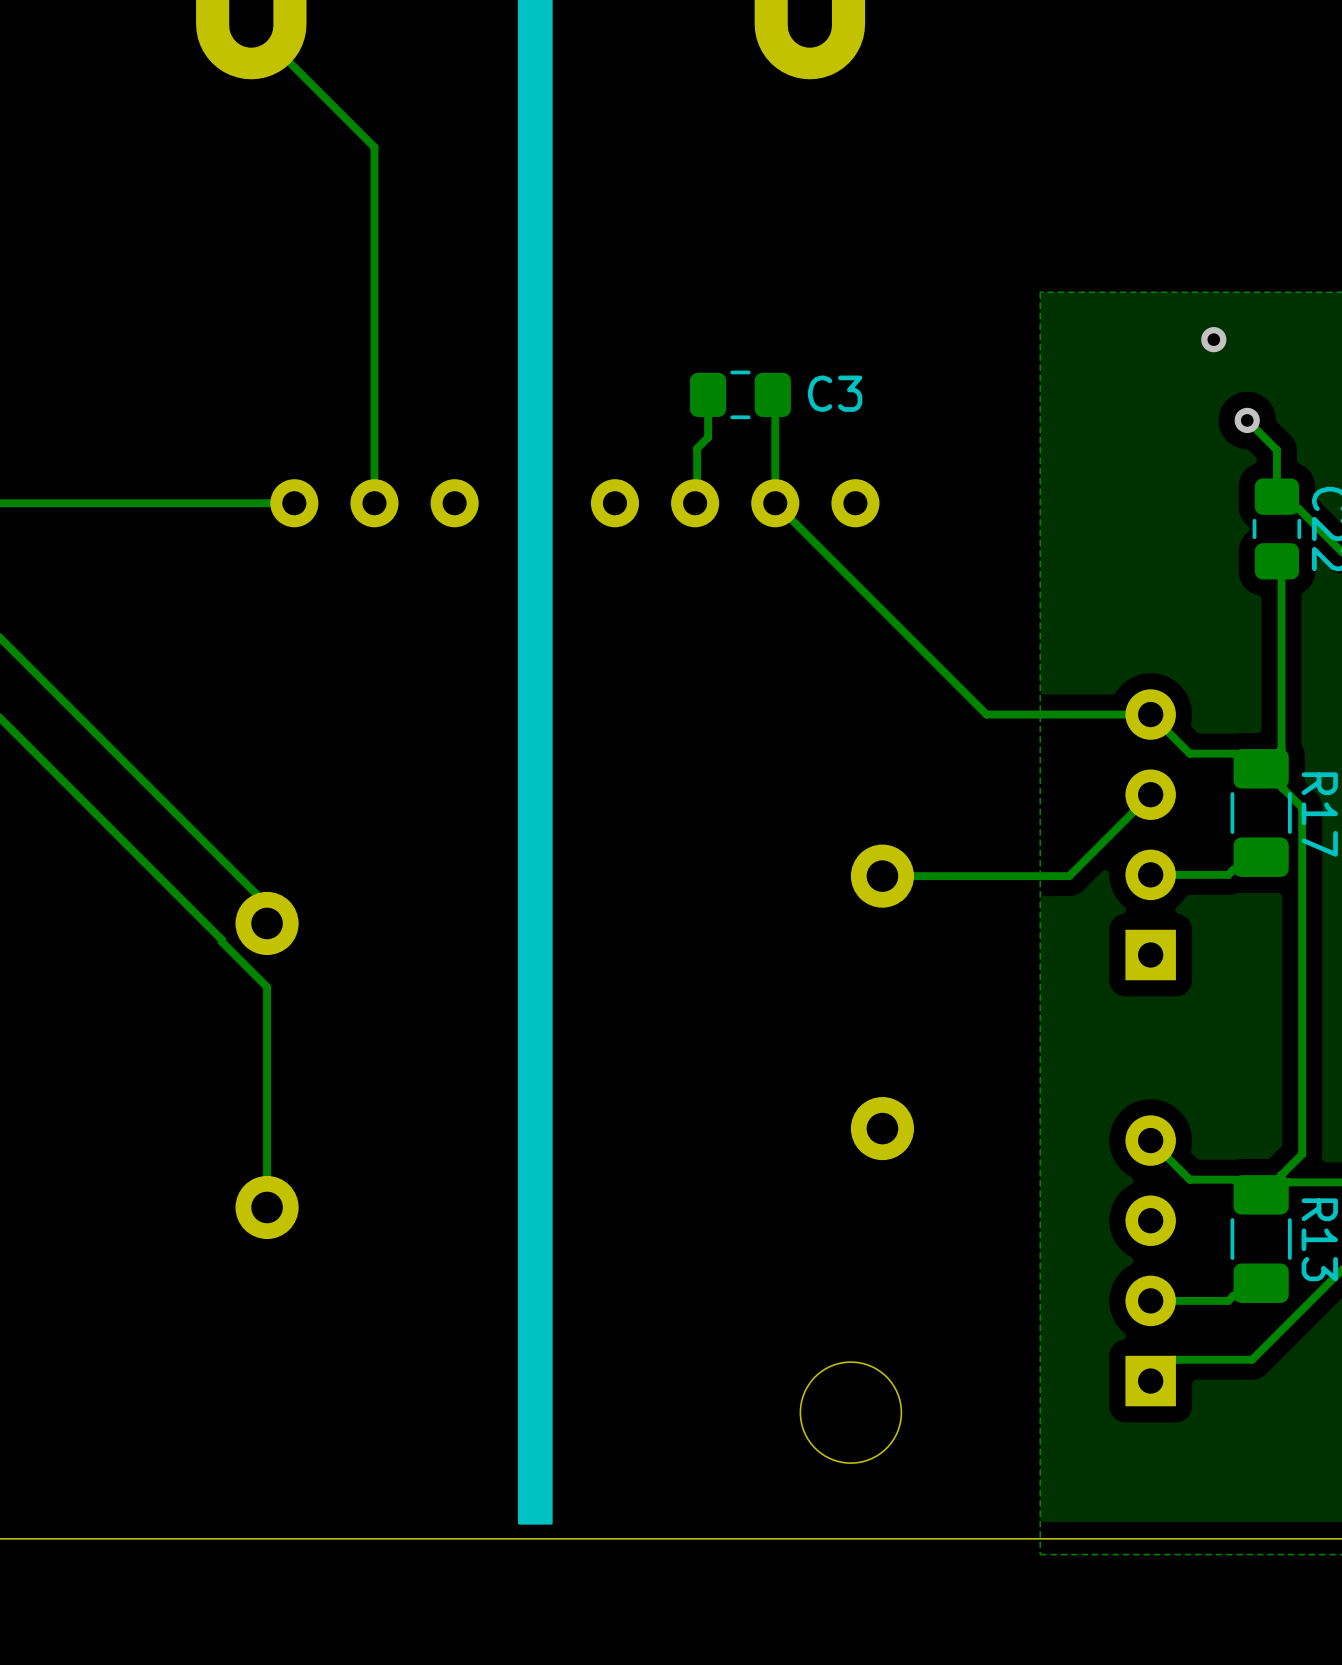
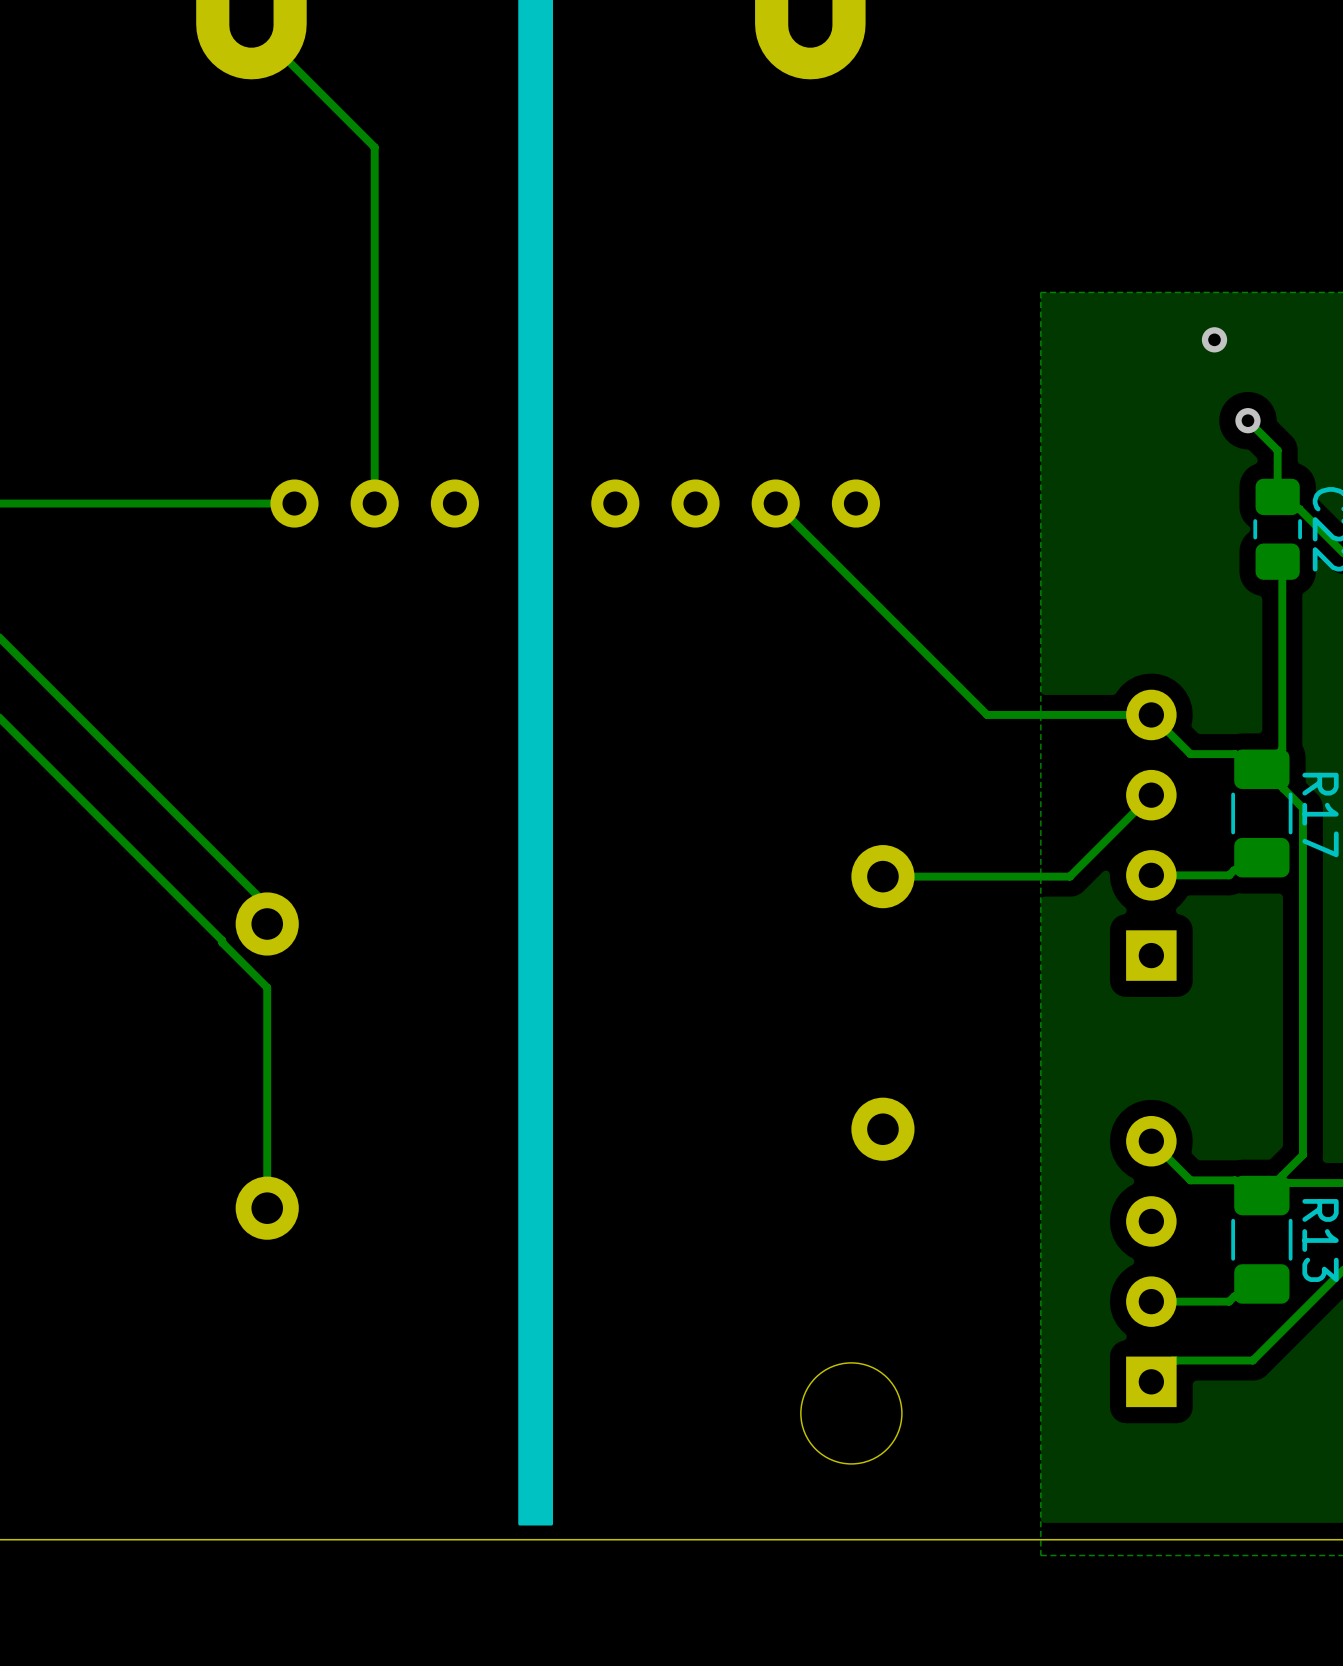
track: (708, 394) (708, 437) (697, 448) (697, 501) -> none
C3: (740, 394) -> none
track: (772, 394) (775, 397) (775, 503) -> none

